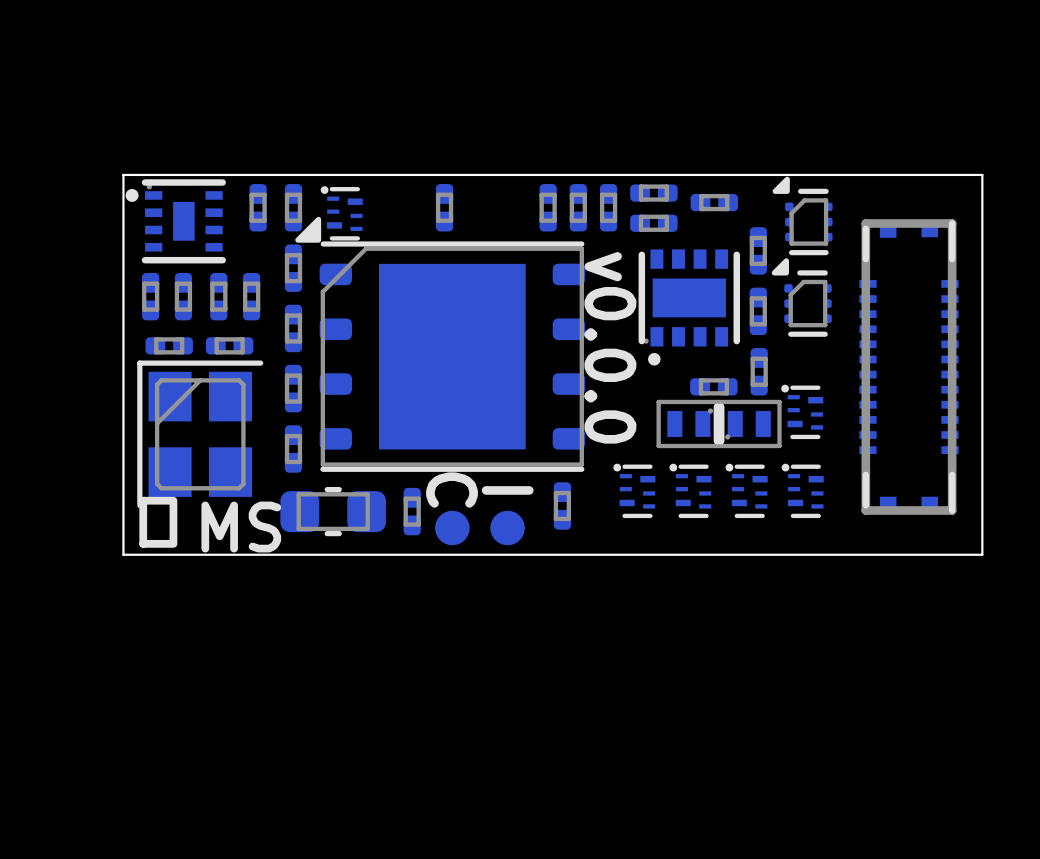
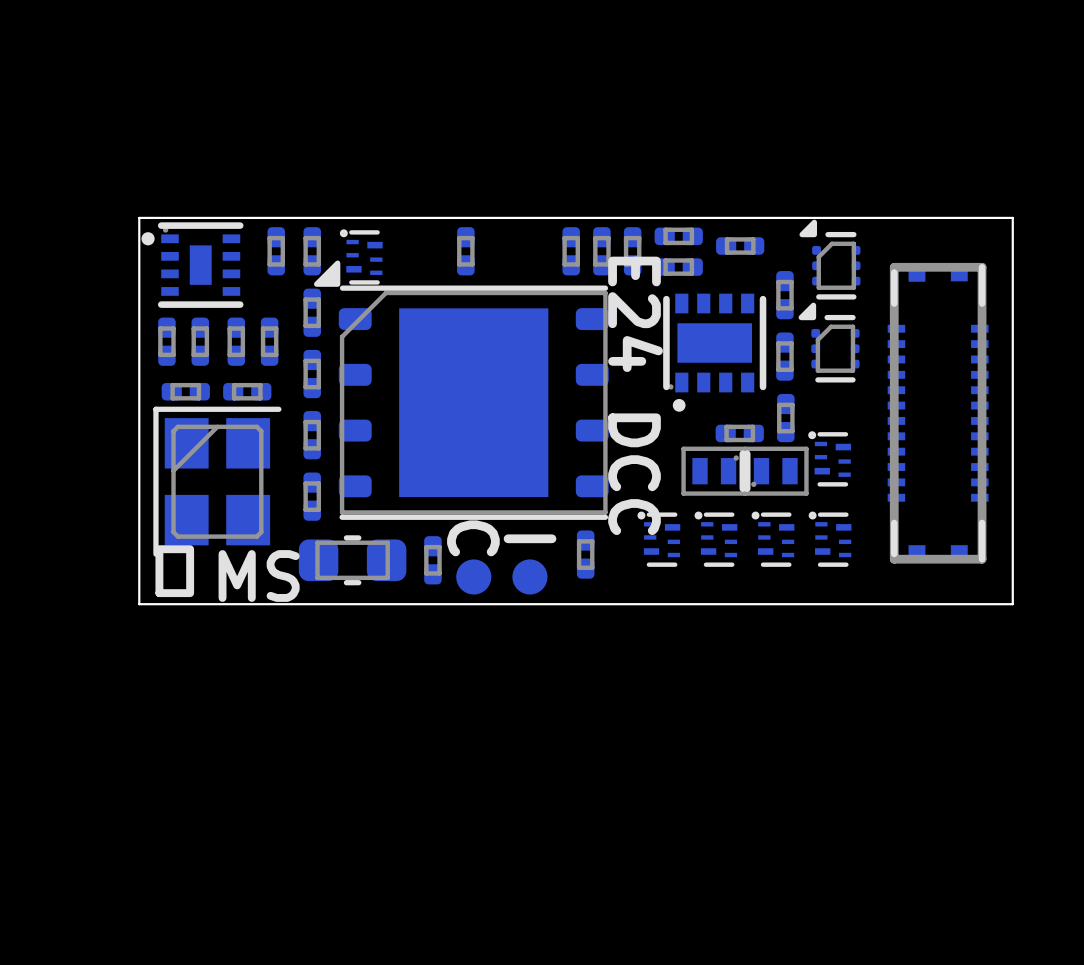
text: v0.0.0 (610, 347) -> E24 DCC (635, 395)

